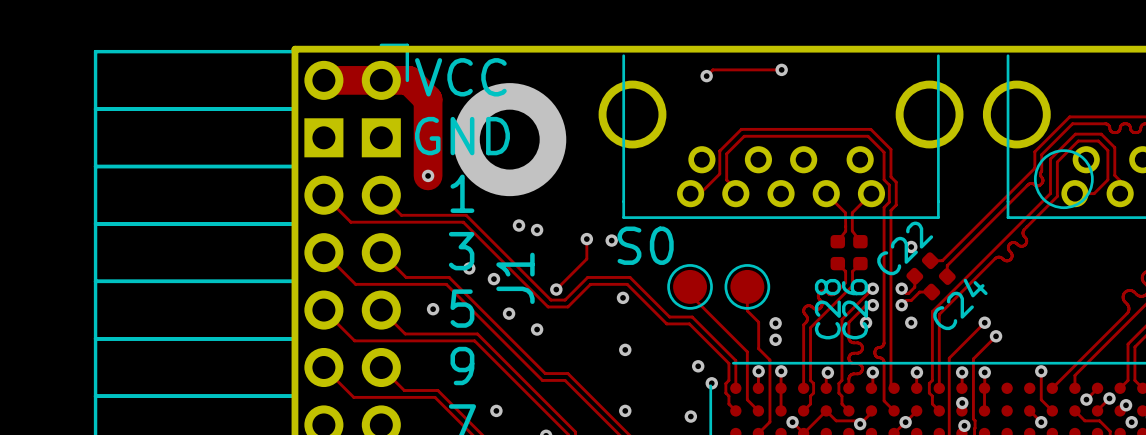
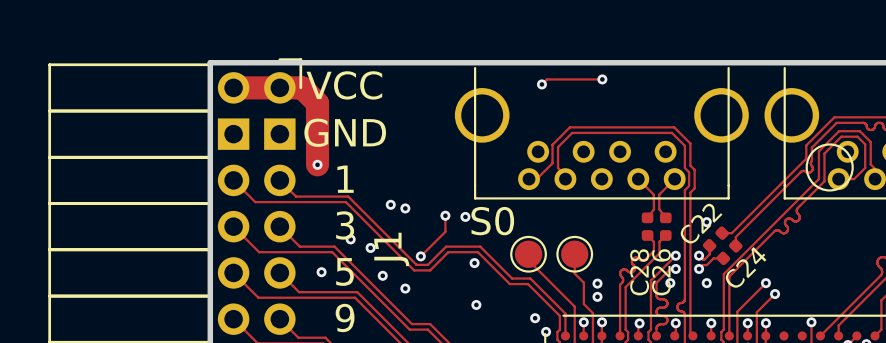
via: (509, 139) -> none

